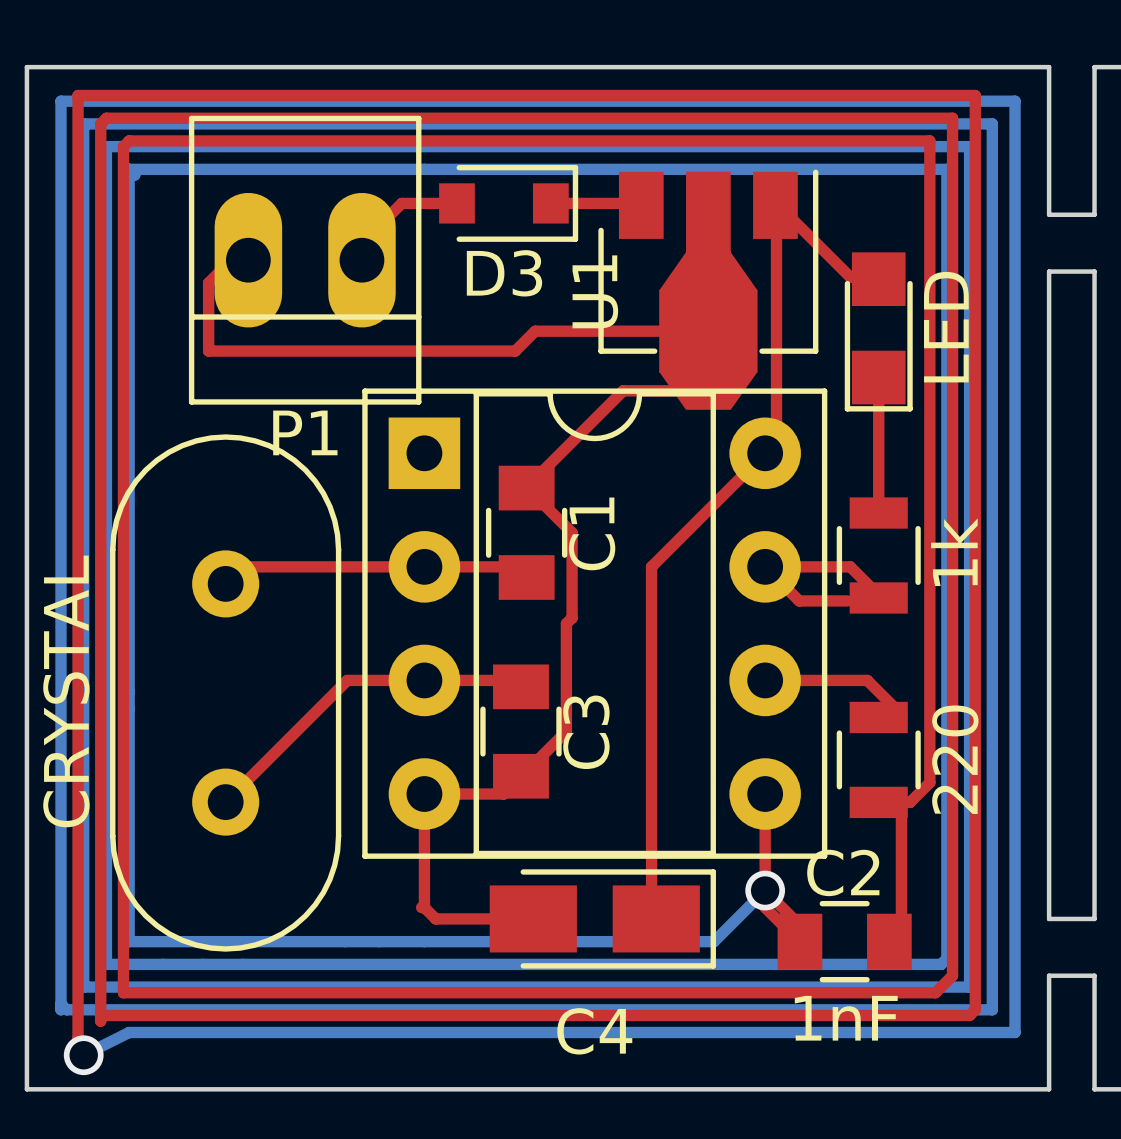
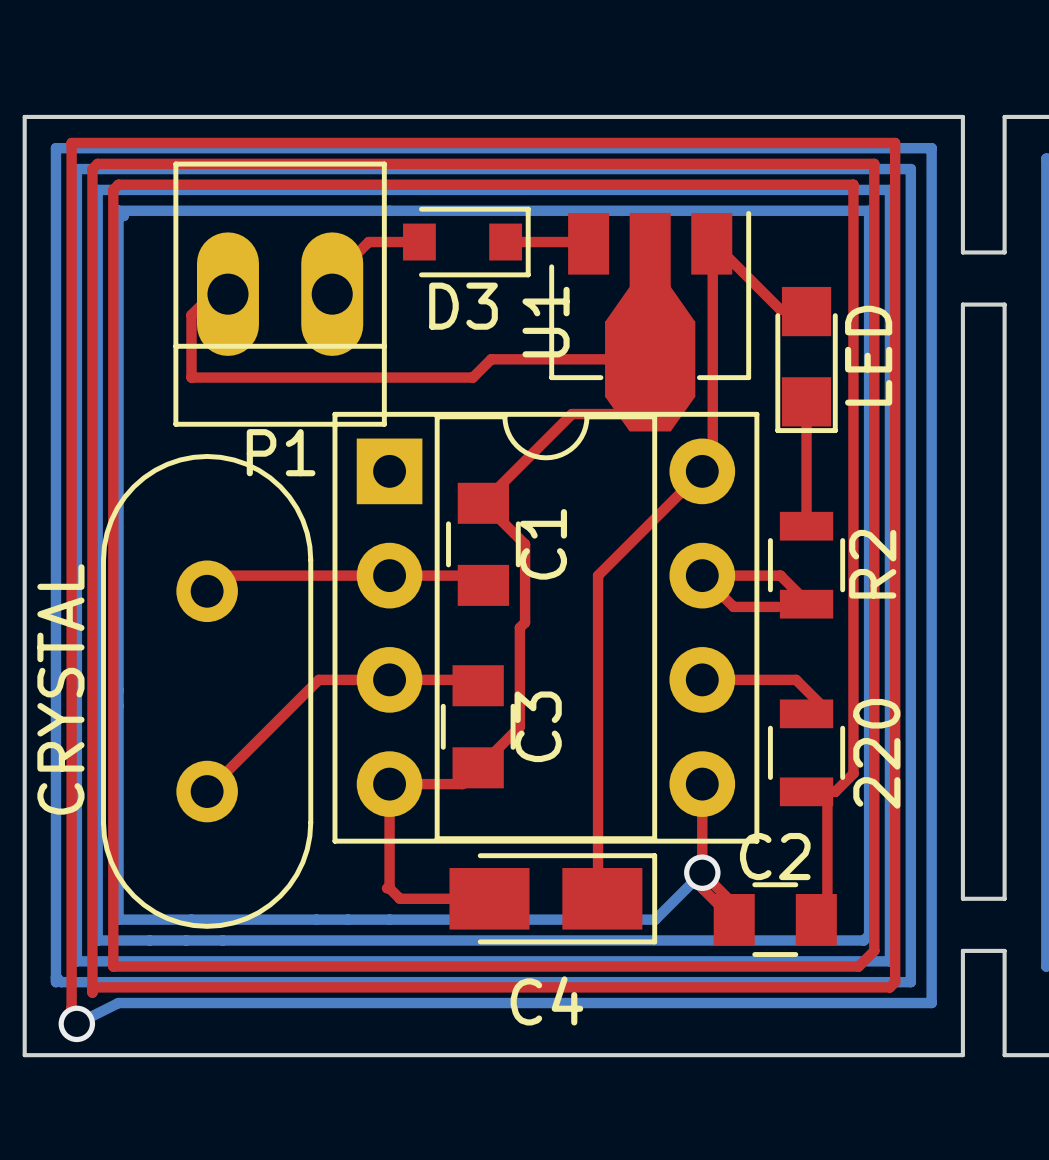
R2 value: 1k (954, 552) -> none
R2 name: none -> R2 (872, 564)
C2 value: 1nF (846, 1018) -> none

